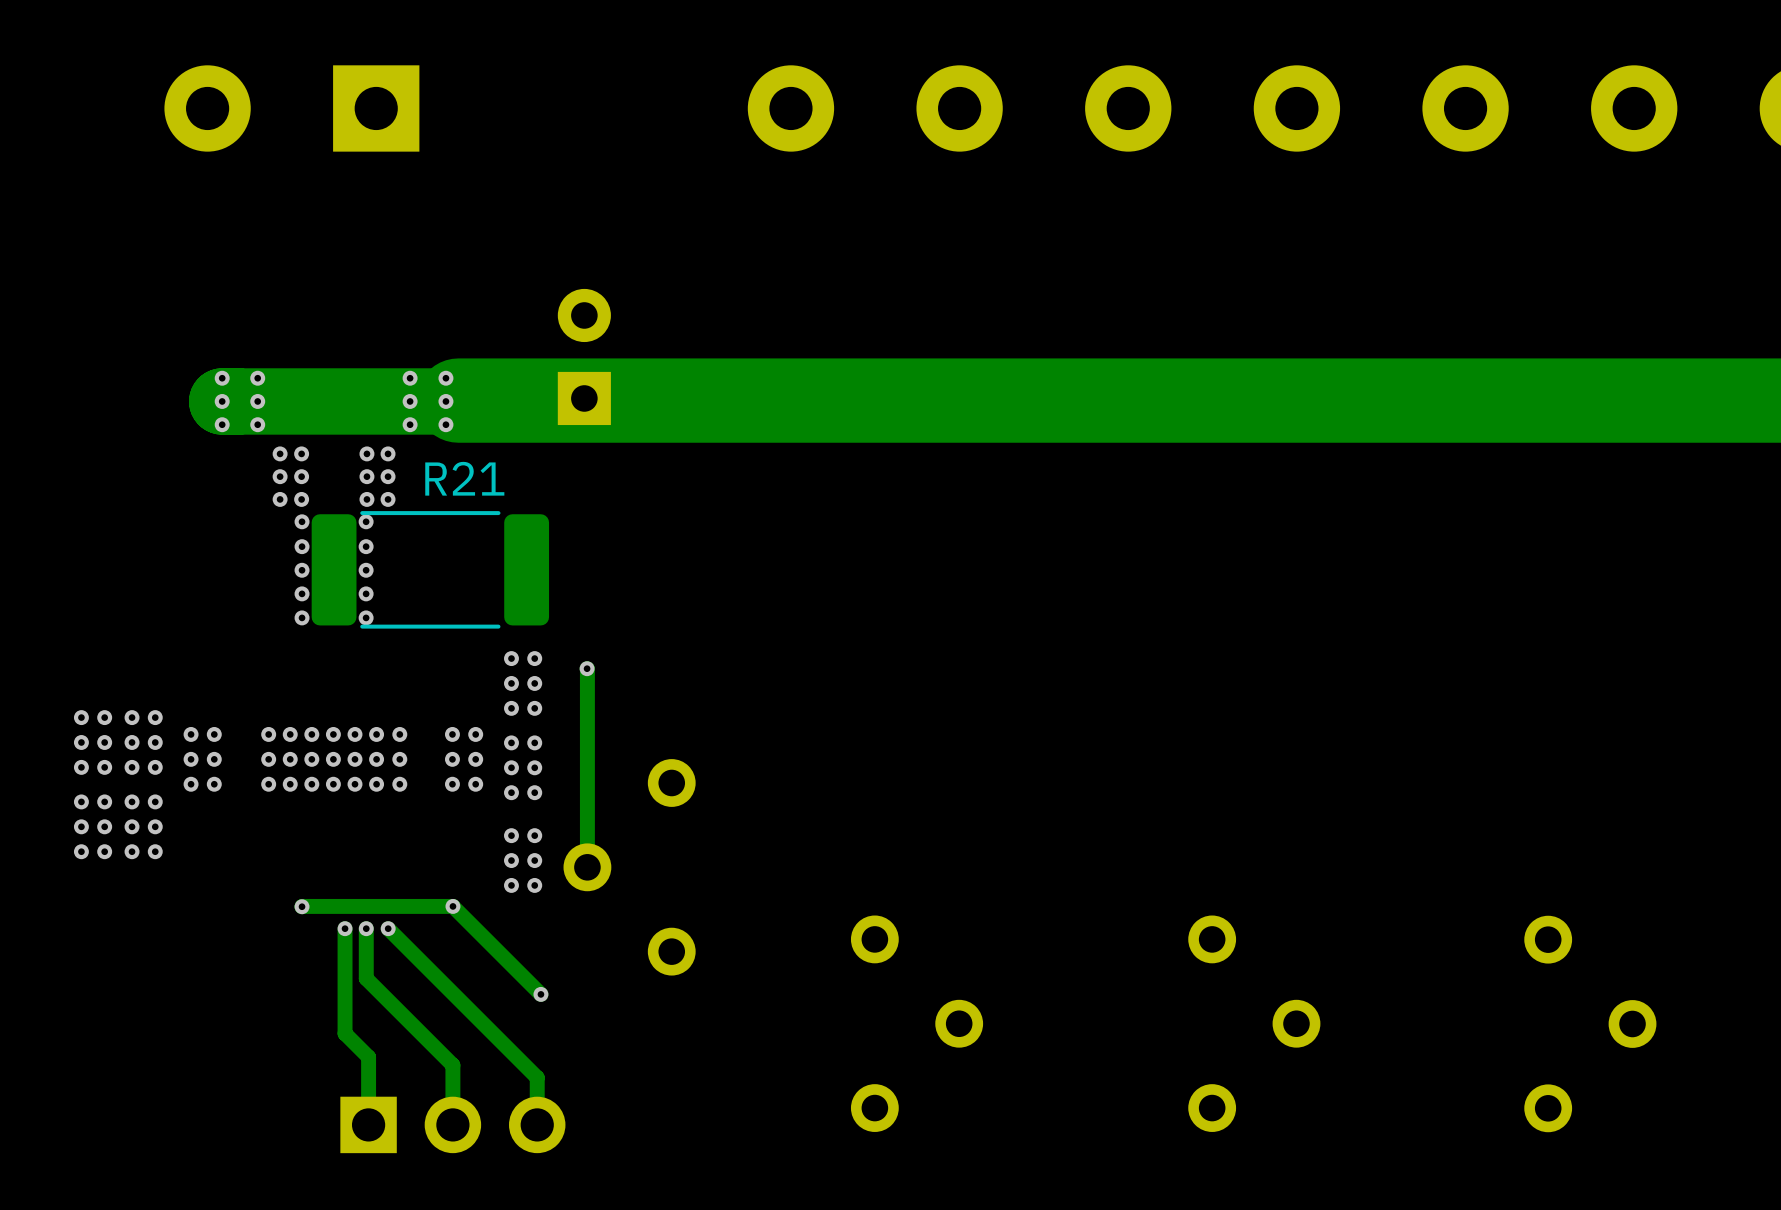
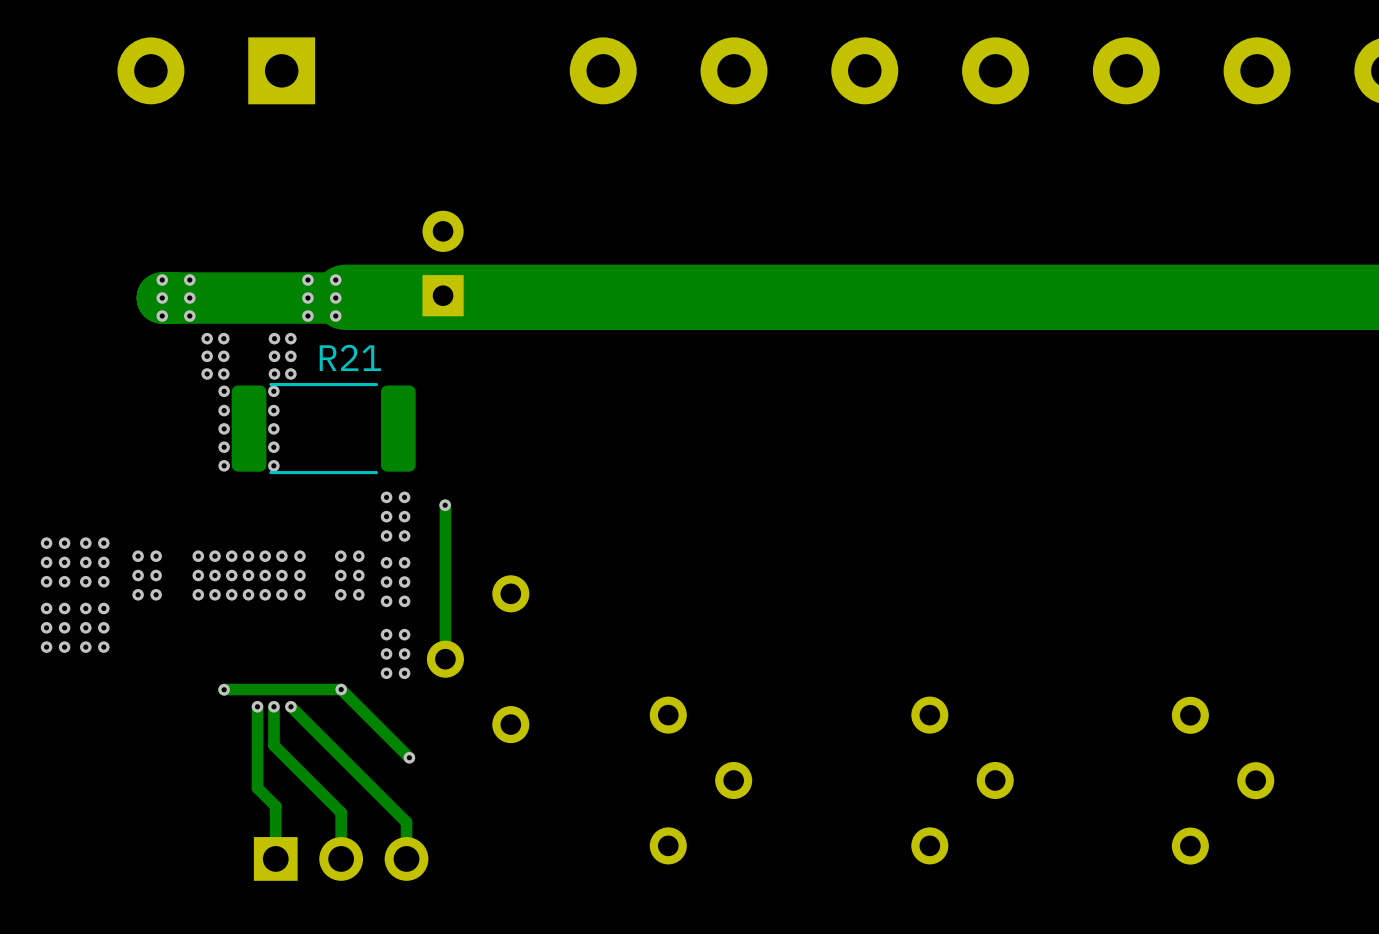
via: none -> (46, 543)
via: (81, 717) -> none
via: none -> (64, 543)
via: (104, 717) -> none
via: none -> (85, 543)
via: (132, 717) -> none
via: none -> (103, 543)
via: (155, 717) -> none
via: none -> (46, 562)
via: (81, 742) -> none
via: none -> (64, 562)
via: (104, 742) -> none
via: none -> (85, 562)
via: (132, 742) -> none
via: none -> (103, 562)
via: (155, 742) -> none
via: none -> (46, 581)
via: (81, 767) -> none
via: none -> (64, 581)
via: (104, 767) -> none
via: none -> (85, 581)
via: (132, 767) -> none
via: none -> (103, 581)
via: (155, 767) -> none
via: none -> (46, 608)
via: (81, 801) -> none
via: none -> (64, 608)
via: (104, 801) -> none
via: none -> (85, 608)
via: (132, 801) -> none
via: none -> (103, 608)
via: (155, 801) -> none
via: none -> (46, 627)
via: (81, 826) -> none
via: none -> (64, 627)
via: (104, 826) -> none
via: none -> (85, 627)
via: (132, 826) -> none
via: none -> (103, 627)
via: (155, 826) -> none
via: none -> (46, 647)
via: (81, 851) -> none
via: none -> (64, 647)
via: (104, 851) -> none
via: none -> (85, 647)
via: (132, 851) -> none
via: none -> (103, 647)
via: (155, 851) -> none

